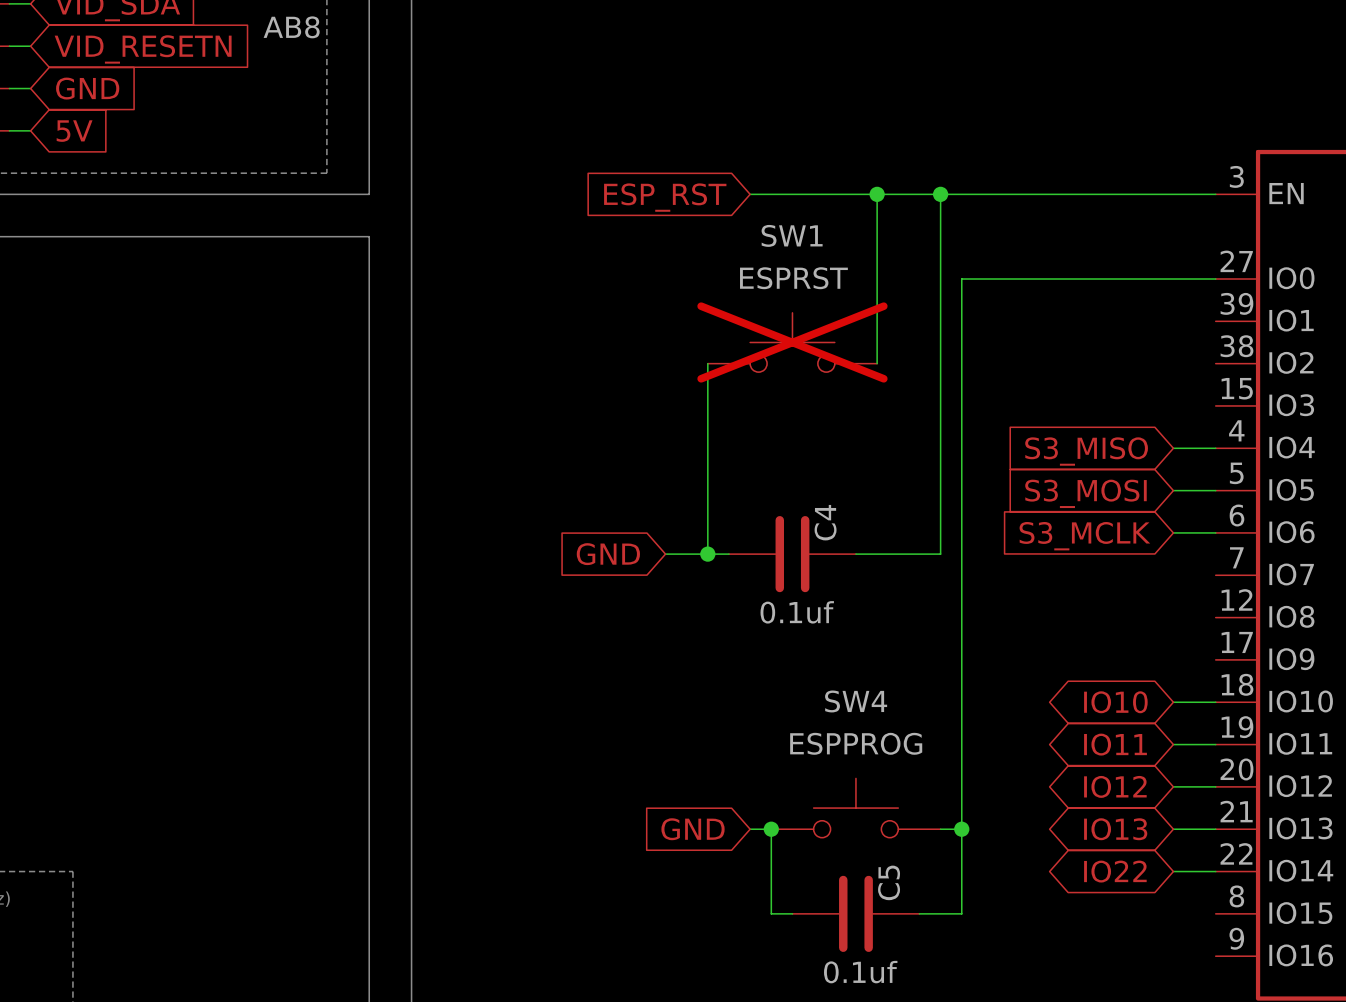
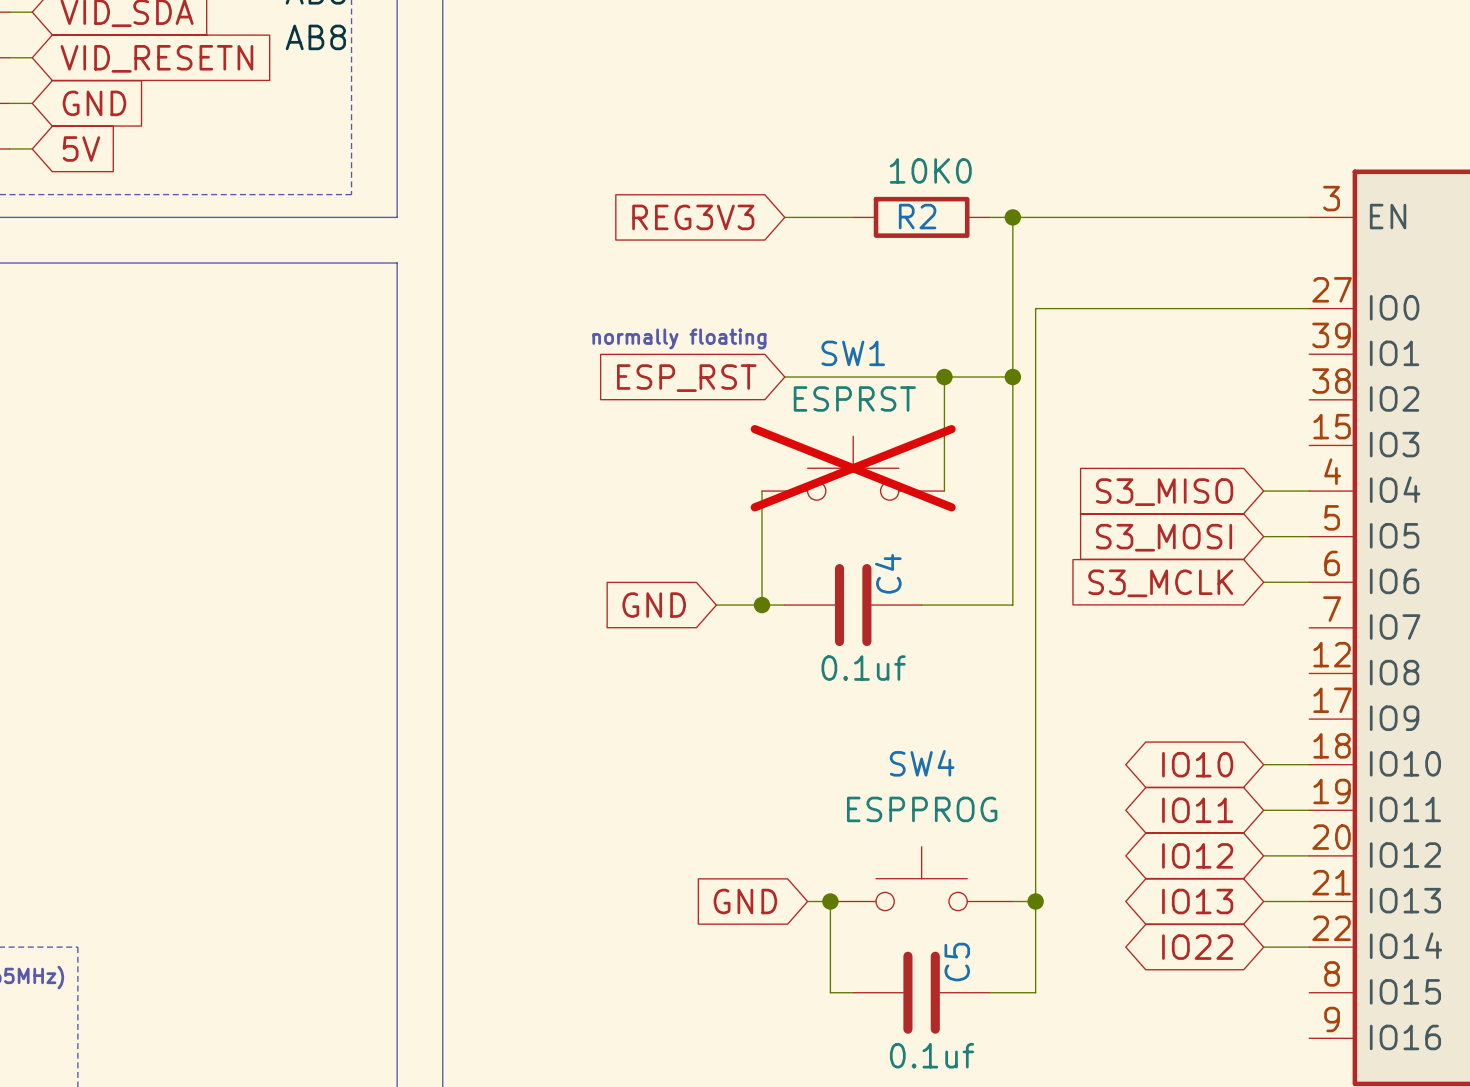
global label: none -> REG3V3 (693, 217)
wire: none -> (784, 217) (807, 217)
wire: (792, 194) (919, 194) -> none
R2: none -> 10K0 (921, 217)
wire: (877, 194) (877, 342) -> none
junction: (877, 194) -> none
global label position: ESP_RST (665, 197) -> ESP_RST (686, 378)
text: none -> normally floating (679, 338)
wire: none -> (784, 377) (1012, 377)
SW1 position: (792, 342) -> (853, 468)
junction: none -> (944, 377)
junction: none -> (1012, 377)
wire: (707, 363) (707, 448) -> (944, 399) (944, 491)

